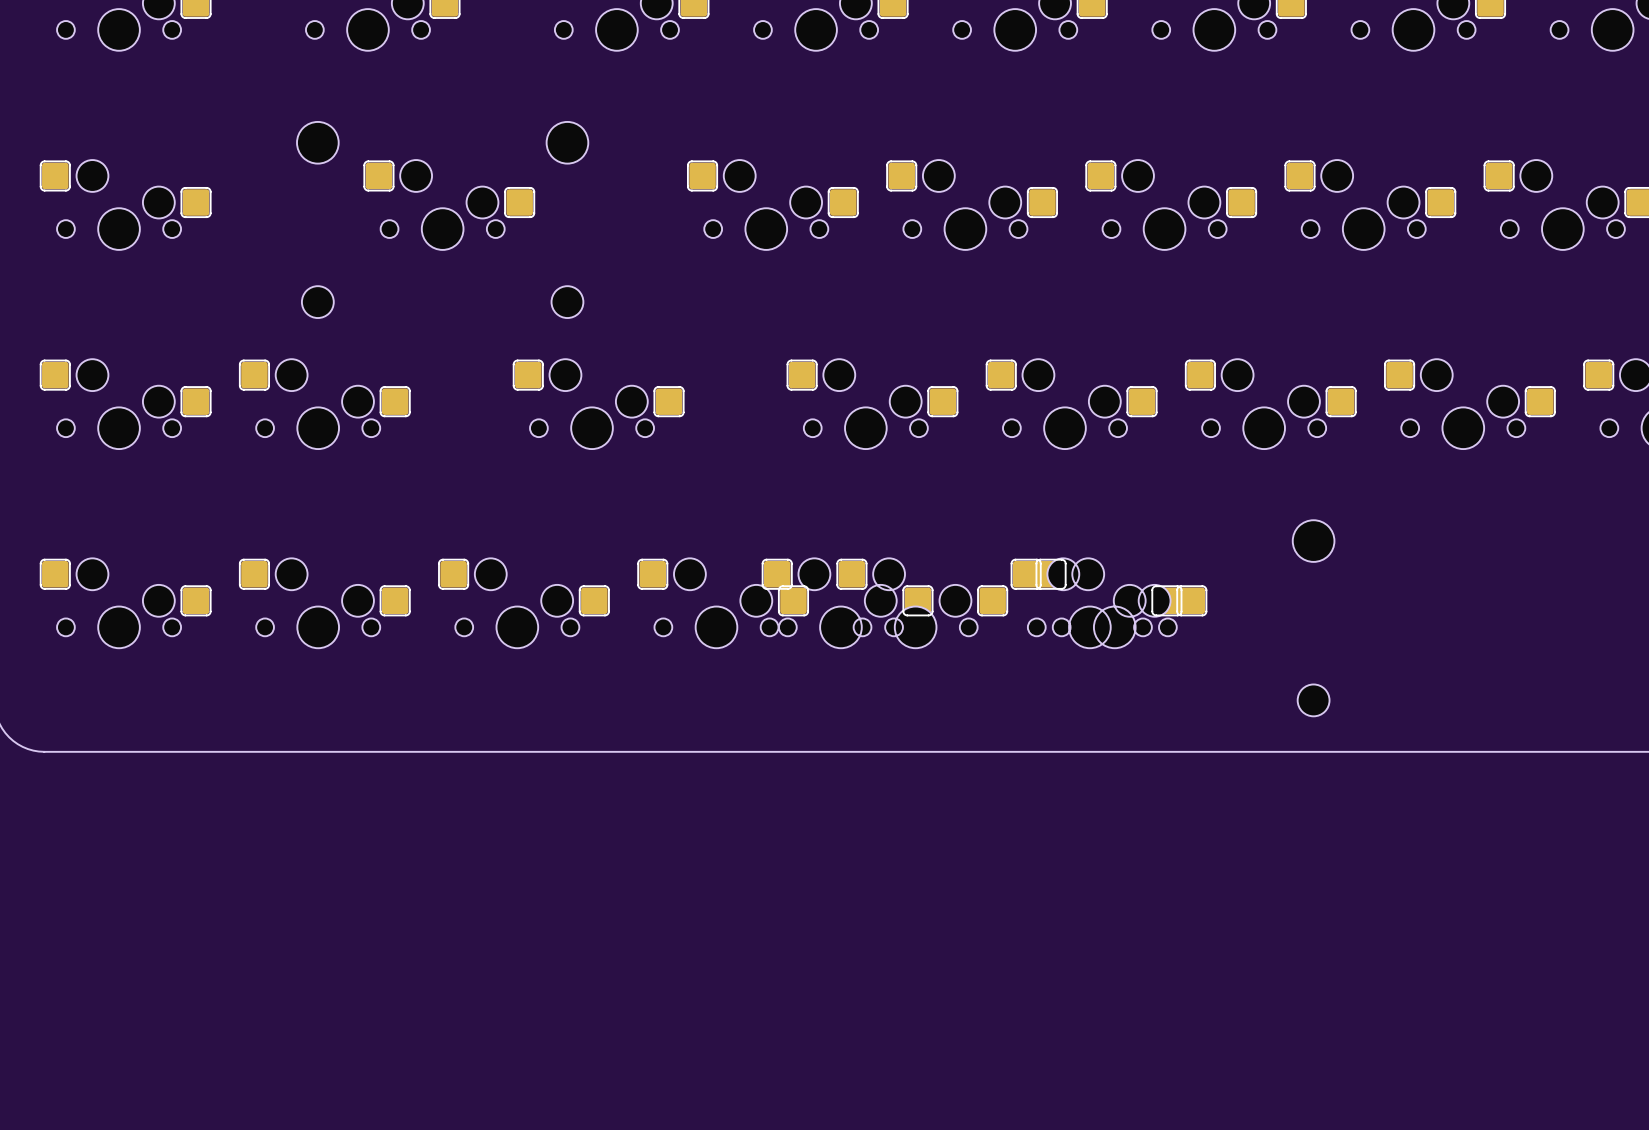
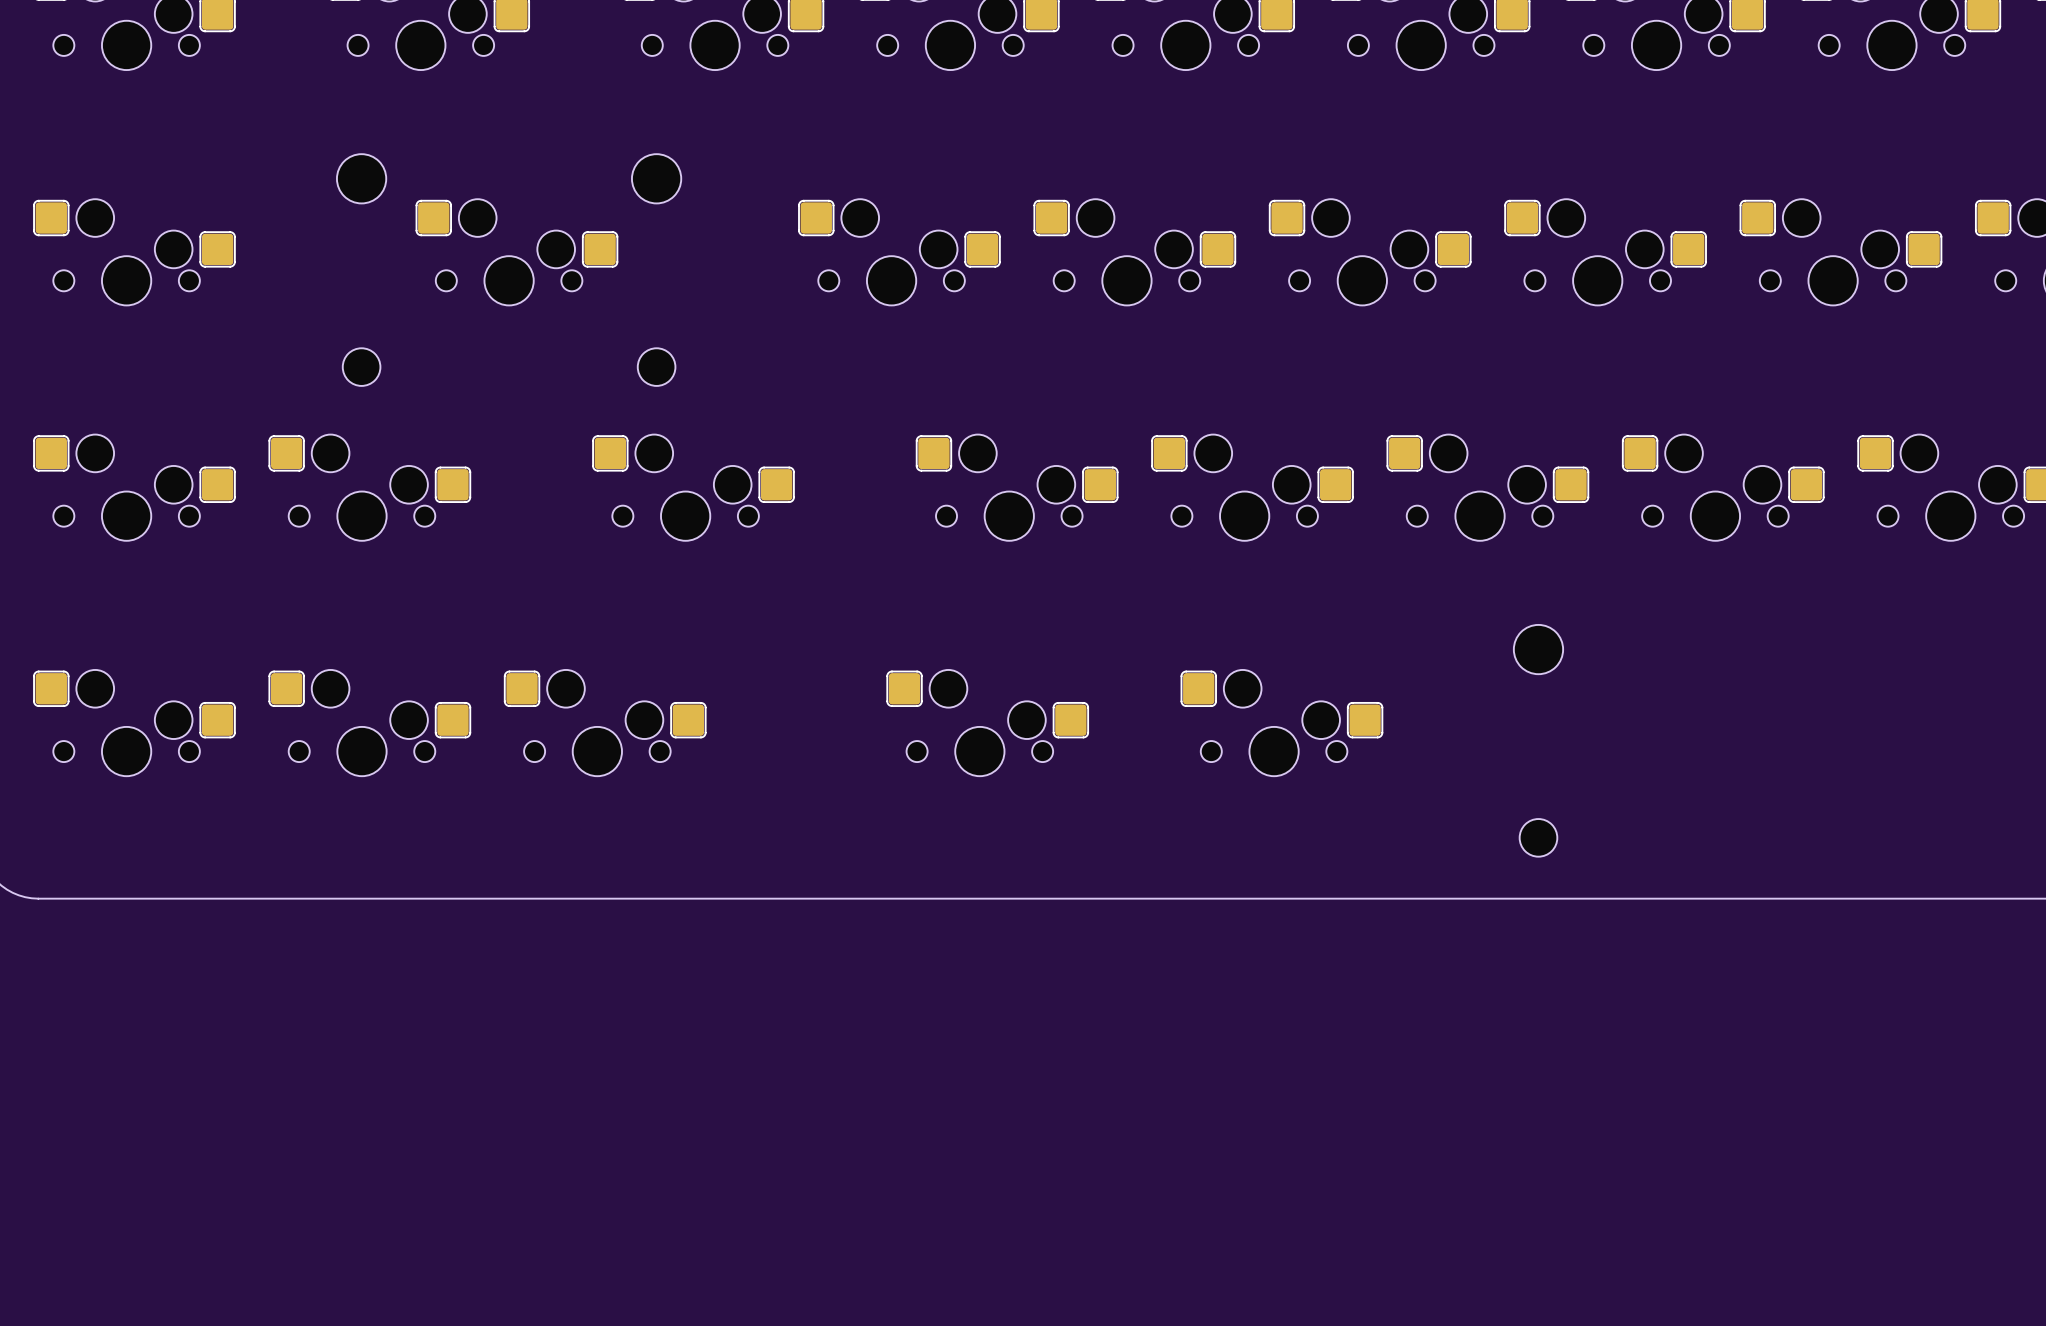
part: (723, 603) -> none
part: (922, 603) -> none
part: (1121, 603) -> none

